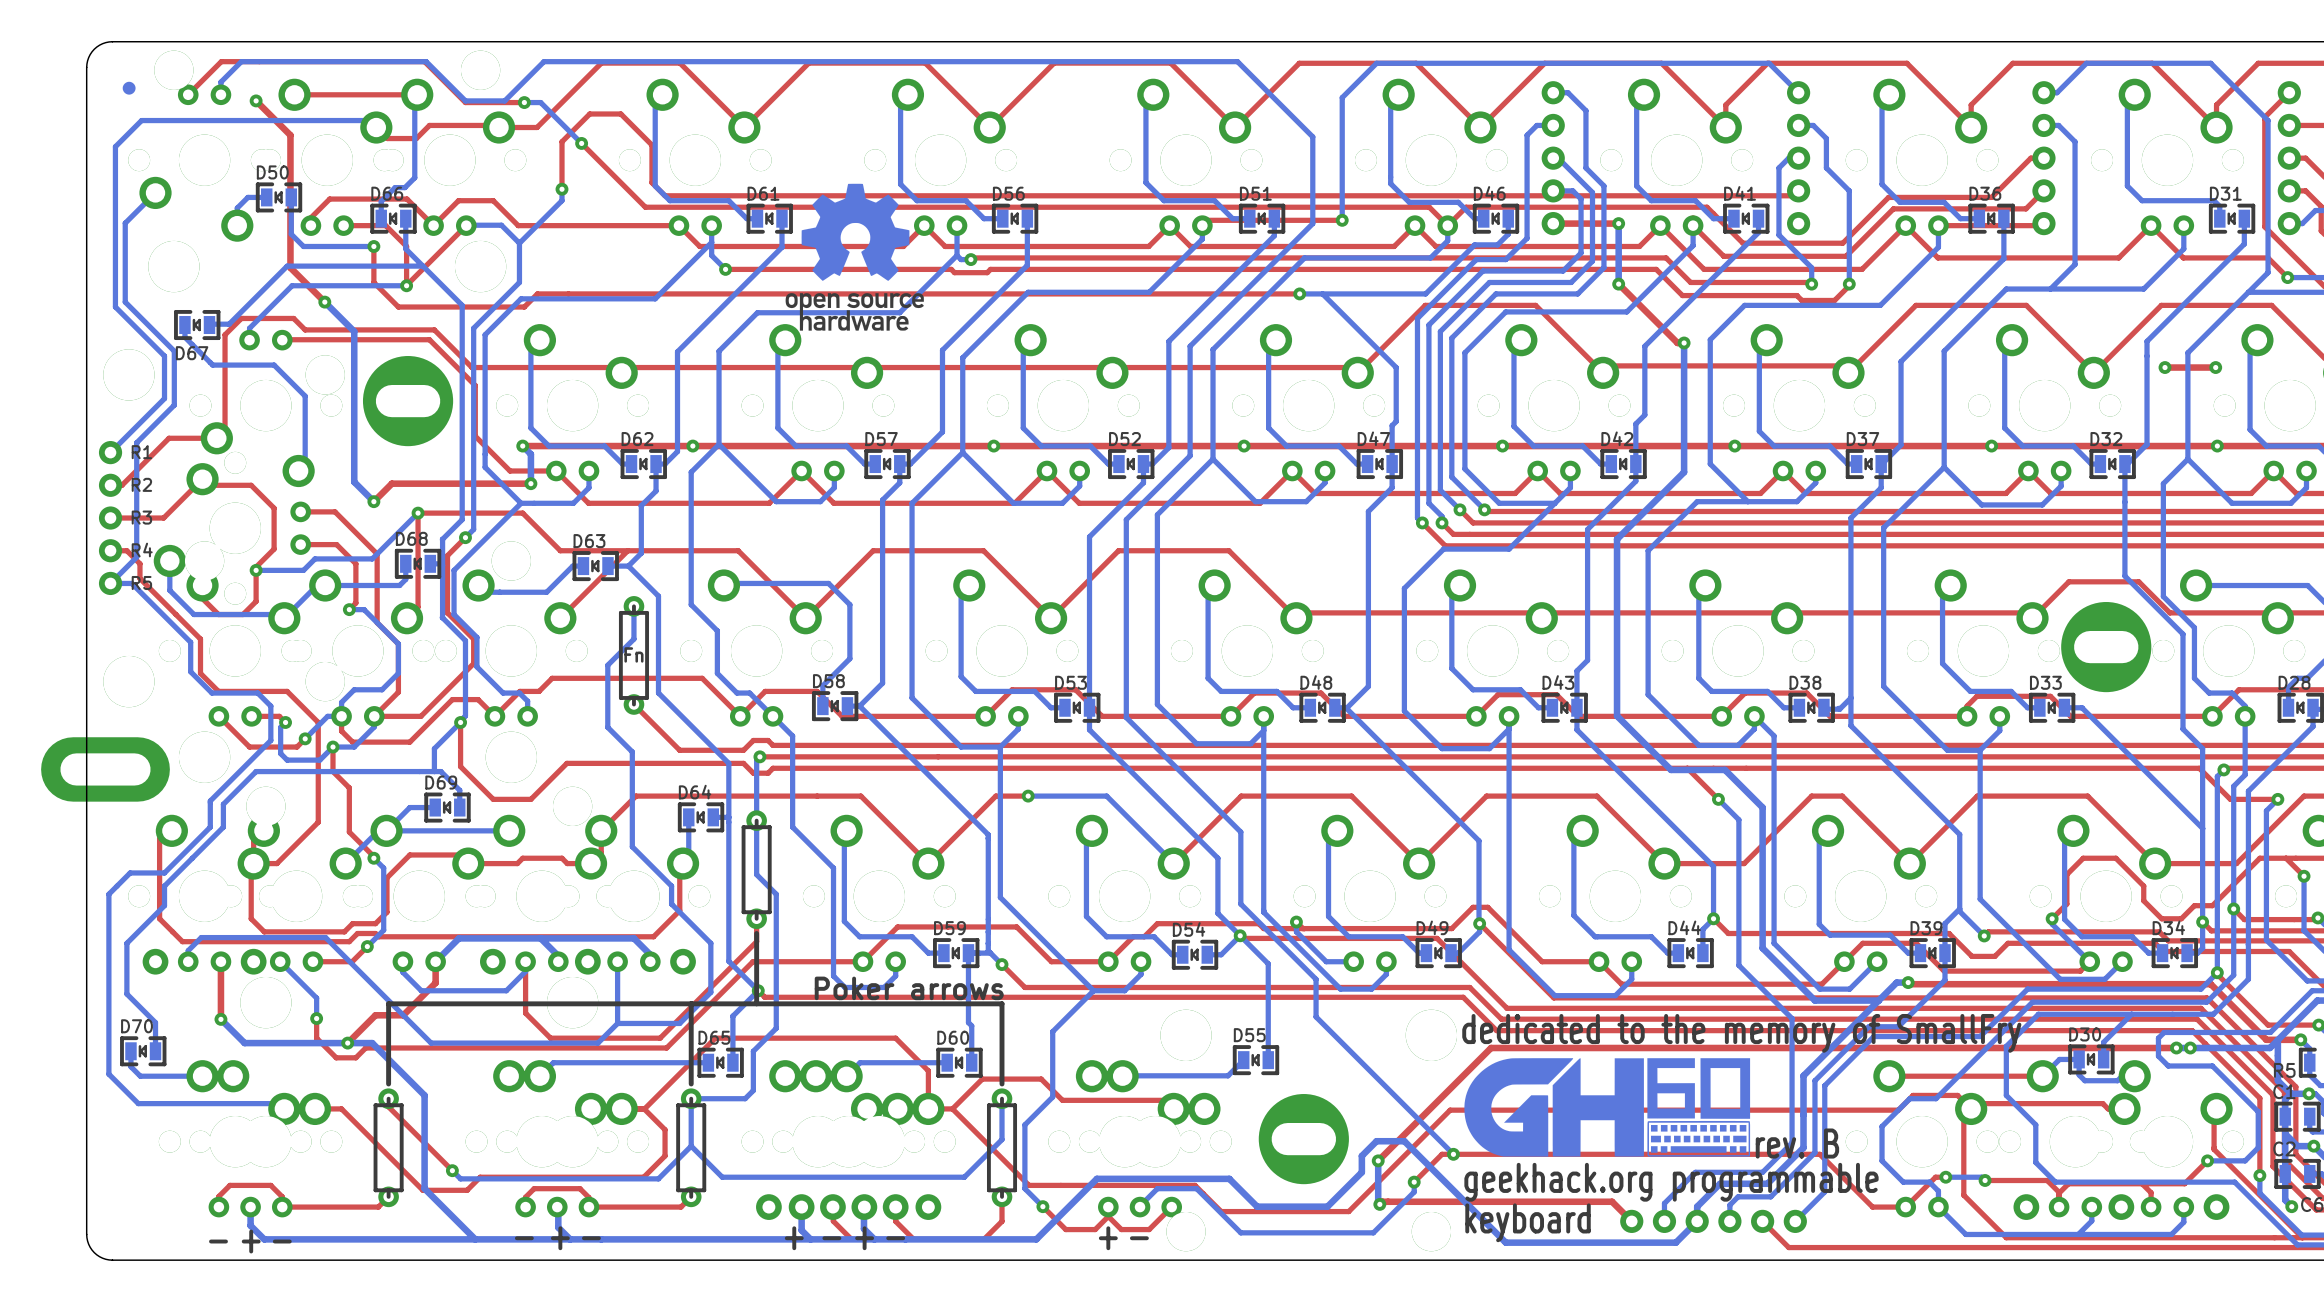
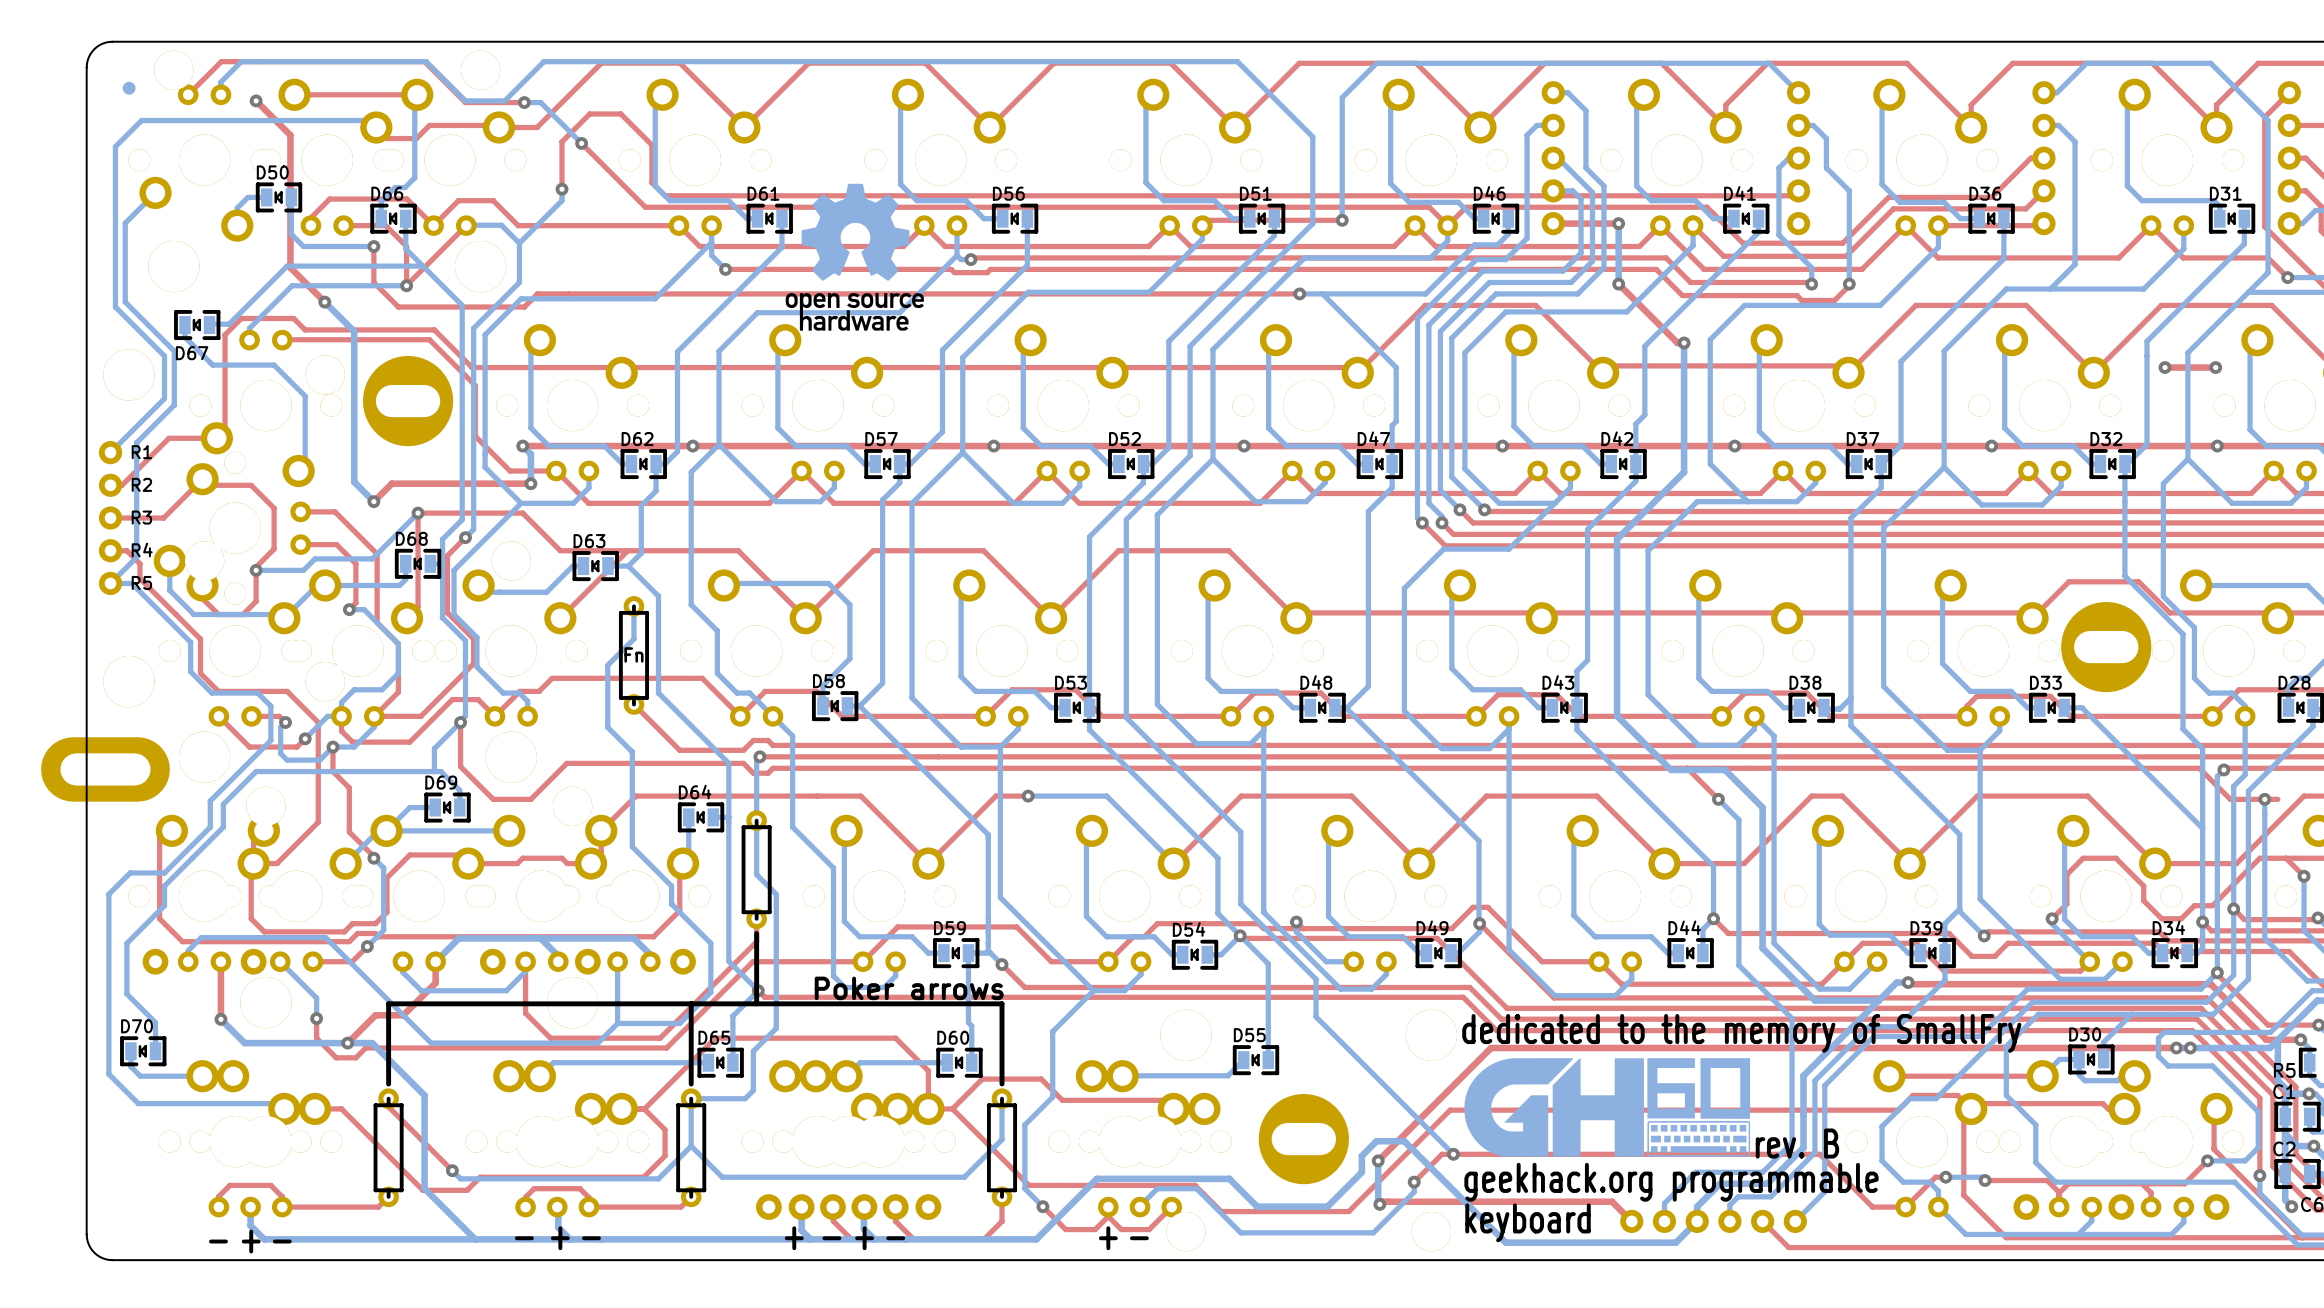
bottom track: (2277, 799) (2266, 810) (2266, 940) -> (2264, 799) (2264, 938) (2266, 940)
via position: (2277, 799) -> (2264, 799)

